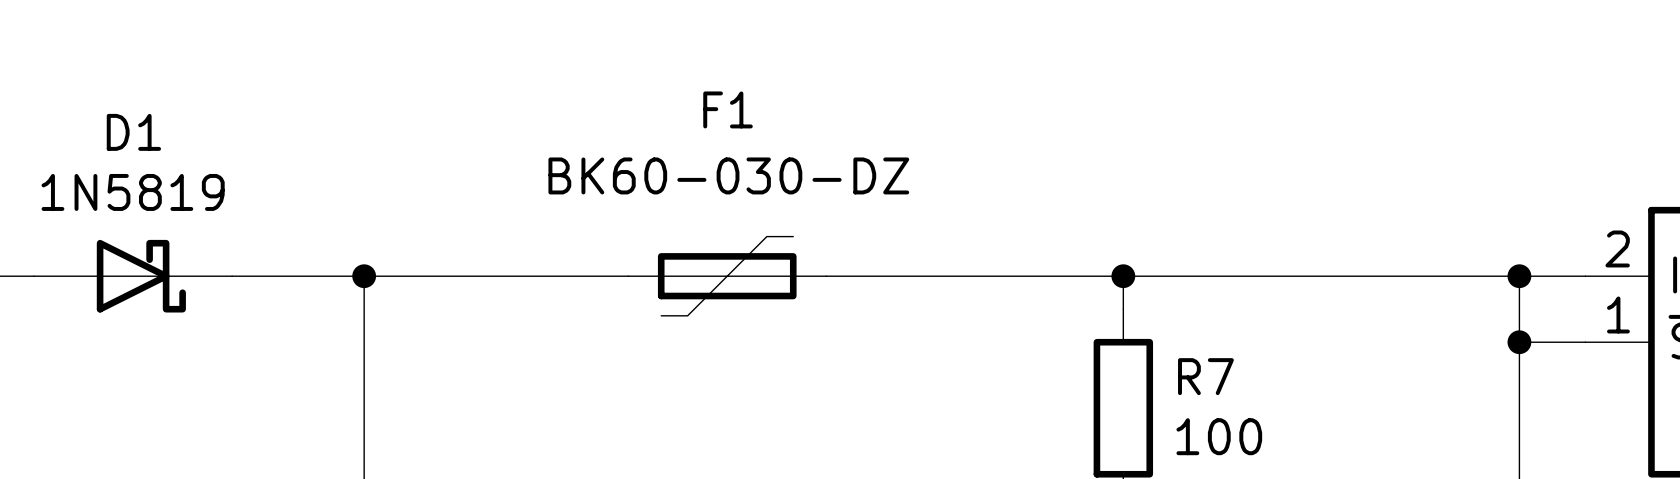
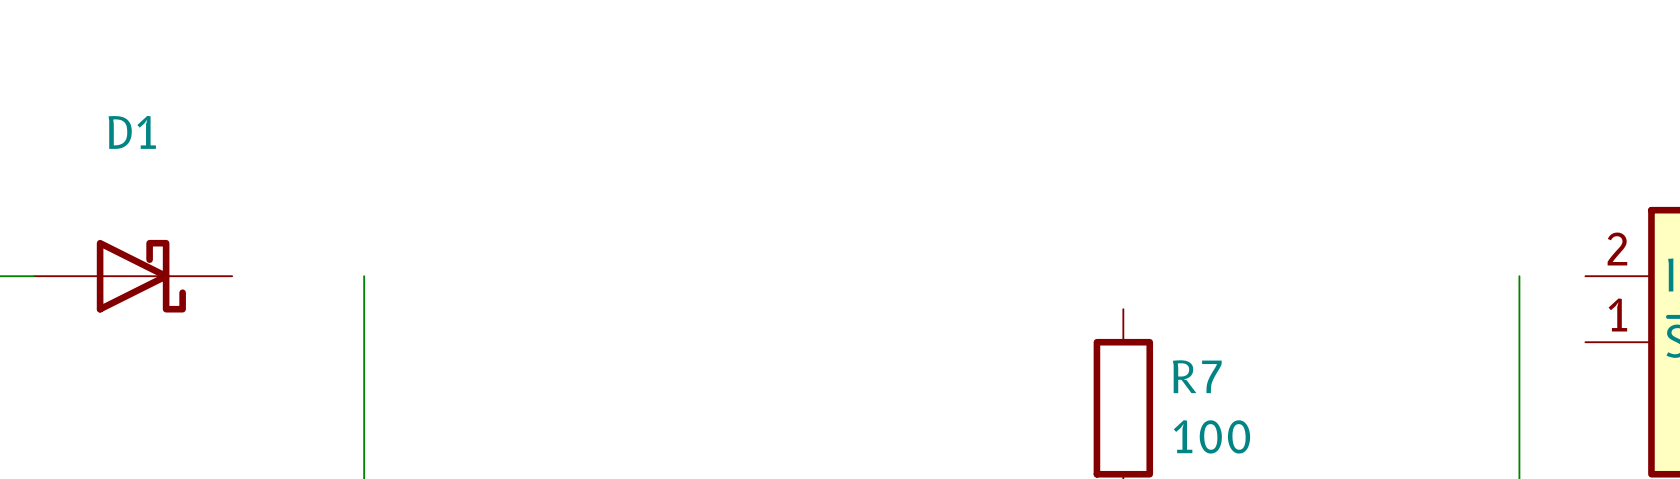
D1 value: 1N5819 (133, 192) -> none
wire: (232, 276) (628, 276) -> none
junction: (364, 276) -> none
F1: BK60-030-DZ (727, 276) -> none
wire: (826, 276) (1585, 276) -> none
wire: (1123, 276) (1123, 309) -> none
junction: (1123, 276) -> none
junction: (1519, 276) -> none
wire: (1519, 342) (1585, 342) -> none
junction: (1519, 342) -> none

